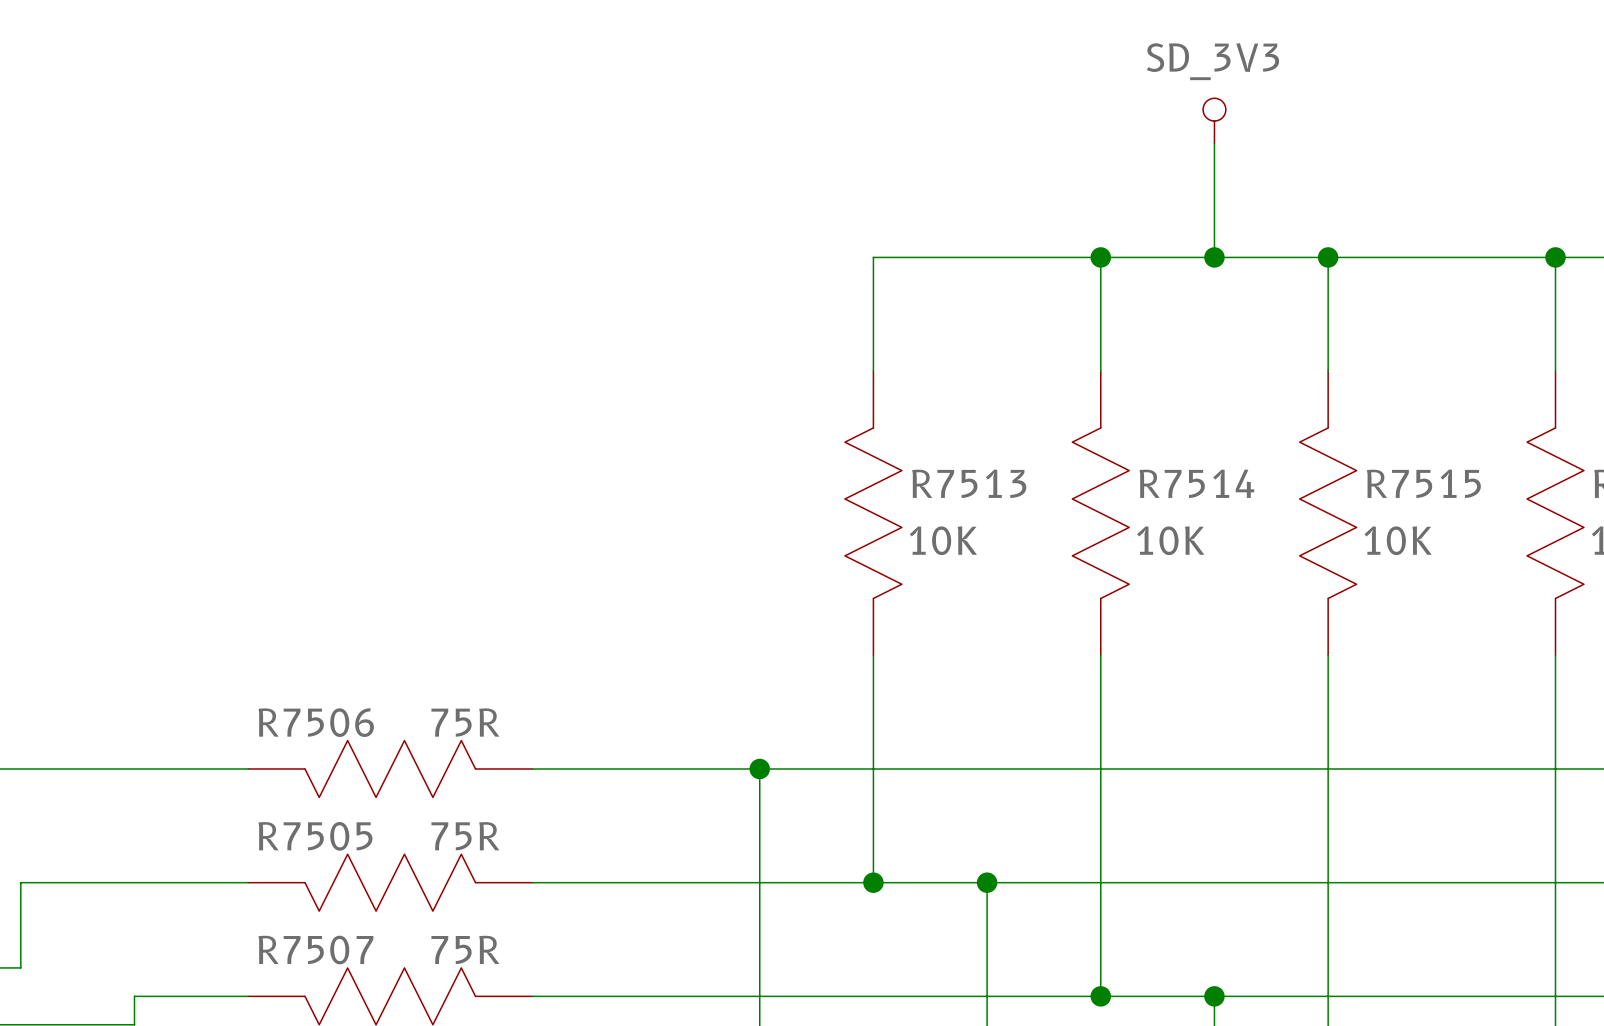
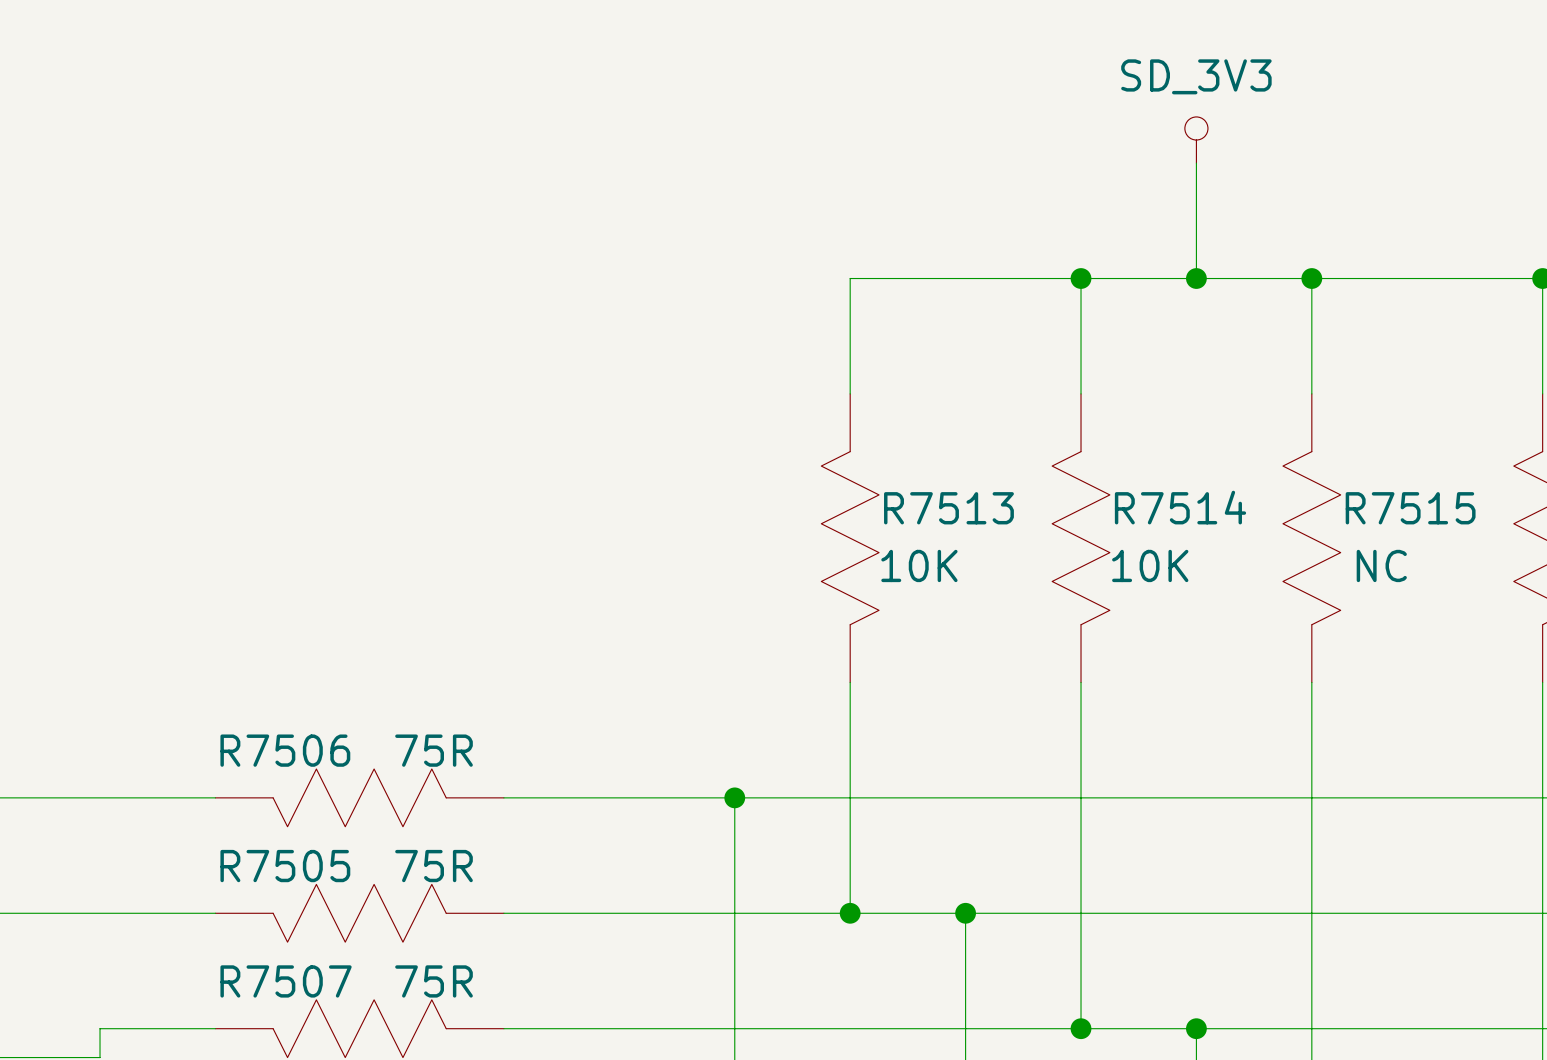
R7515 value: 10K (1398, 540) -> NC (1381, 565)

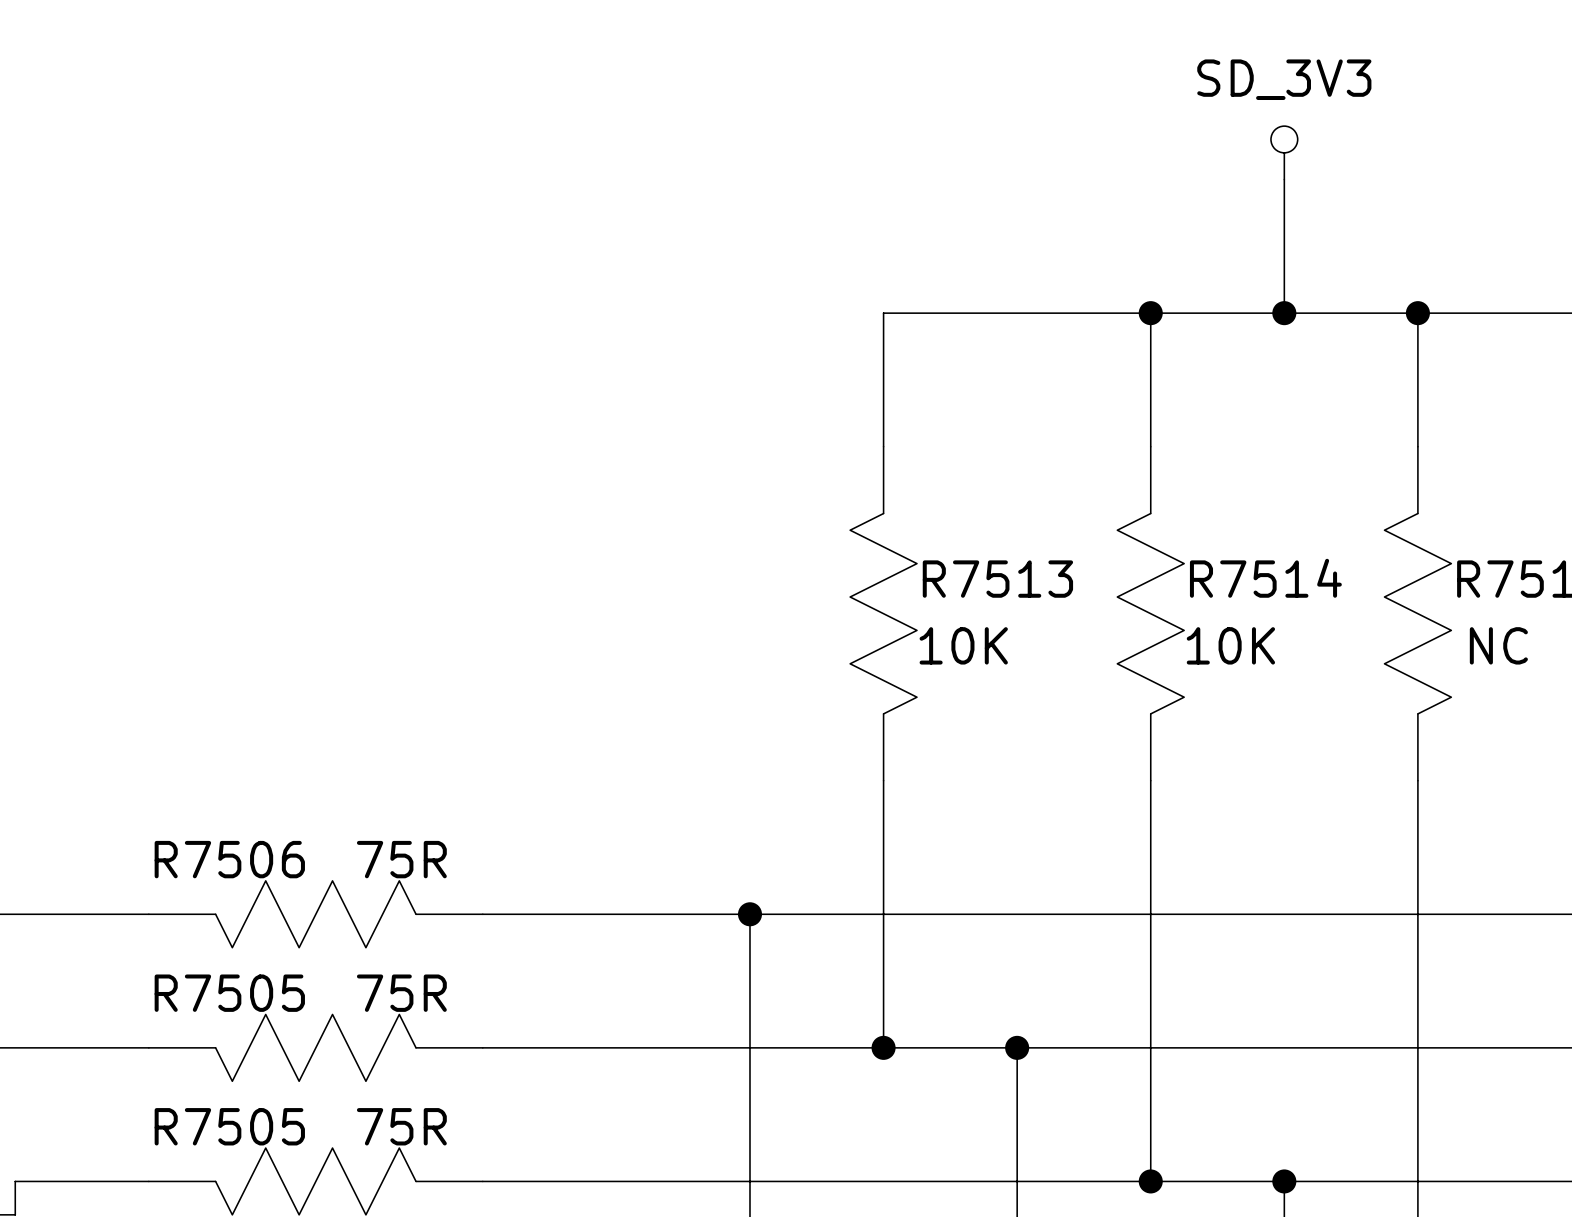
R7507 name: R7507 (286, 981) -> R7505 (229, 1126)

